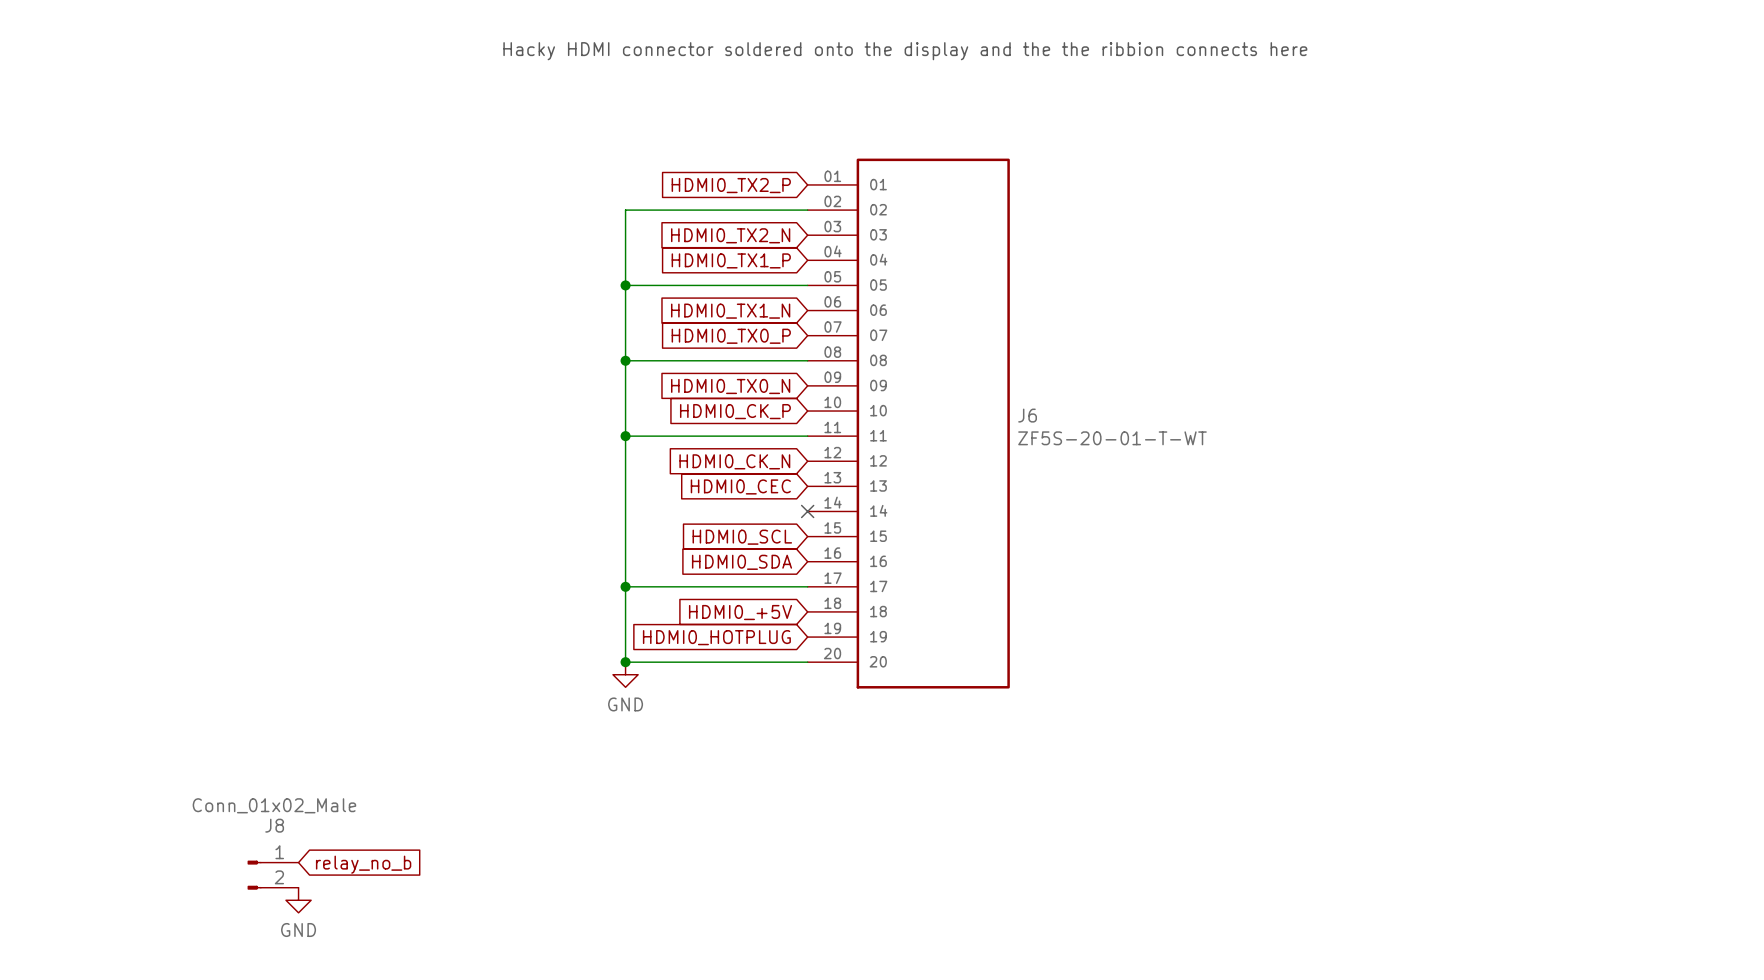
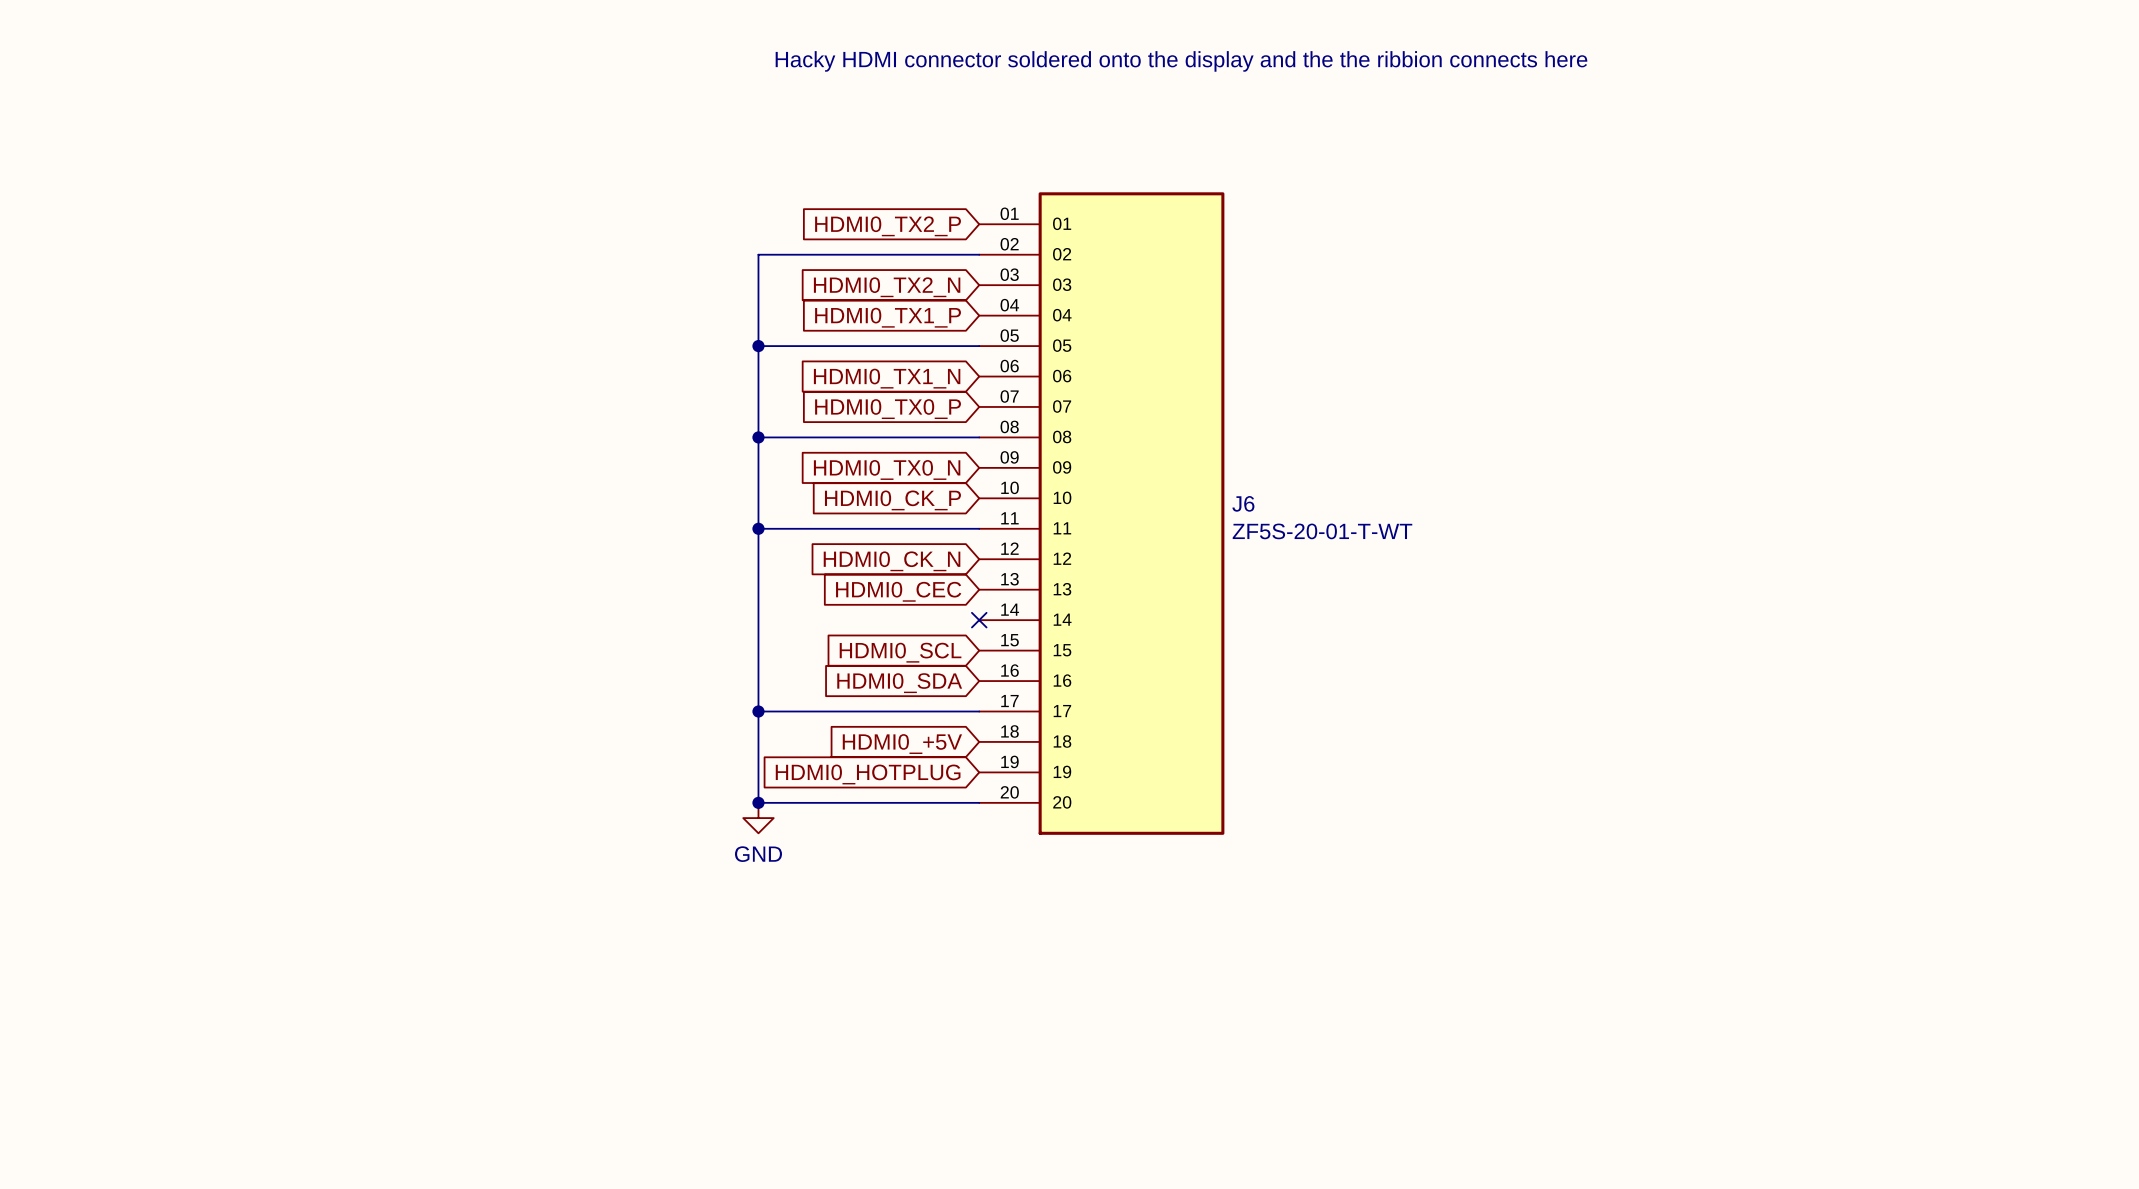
global label: relay_no_b (363, 864) -> none
J8: Conn_01x02_Male (273, 875) -> none
power symbol: GND (298, 900) -> none

